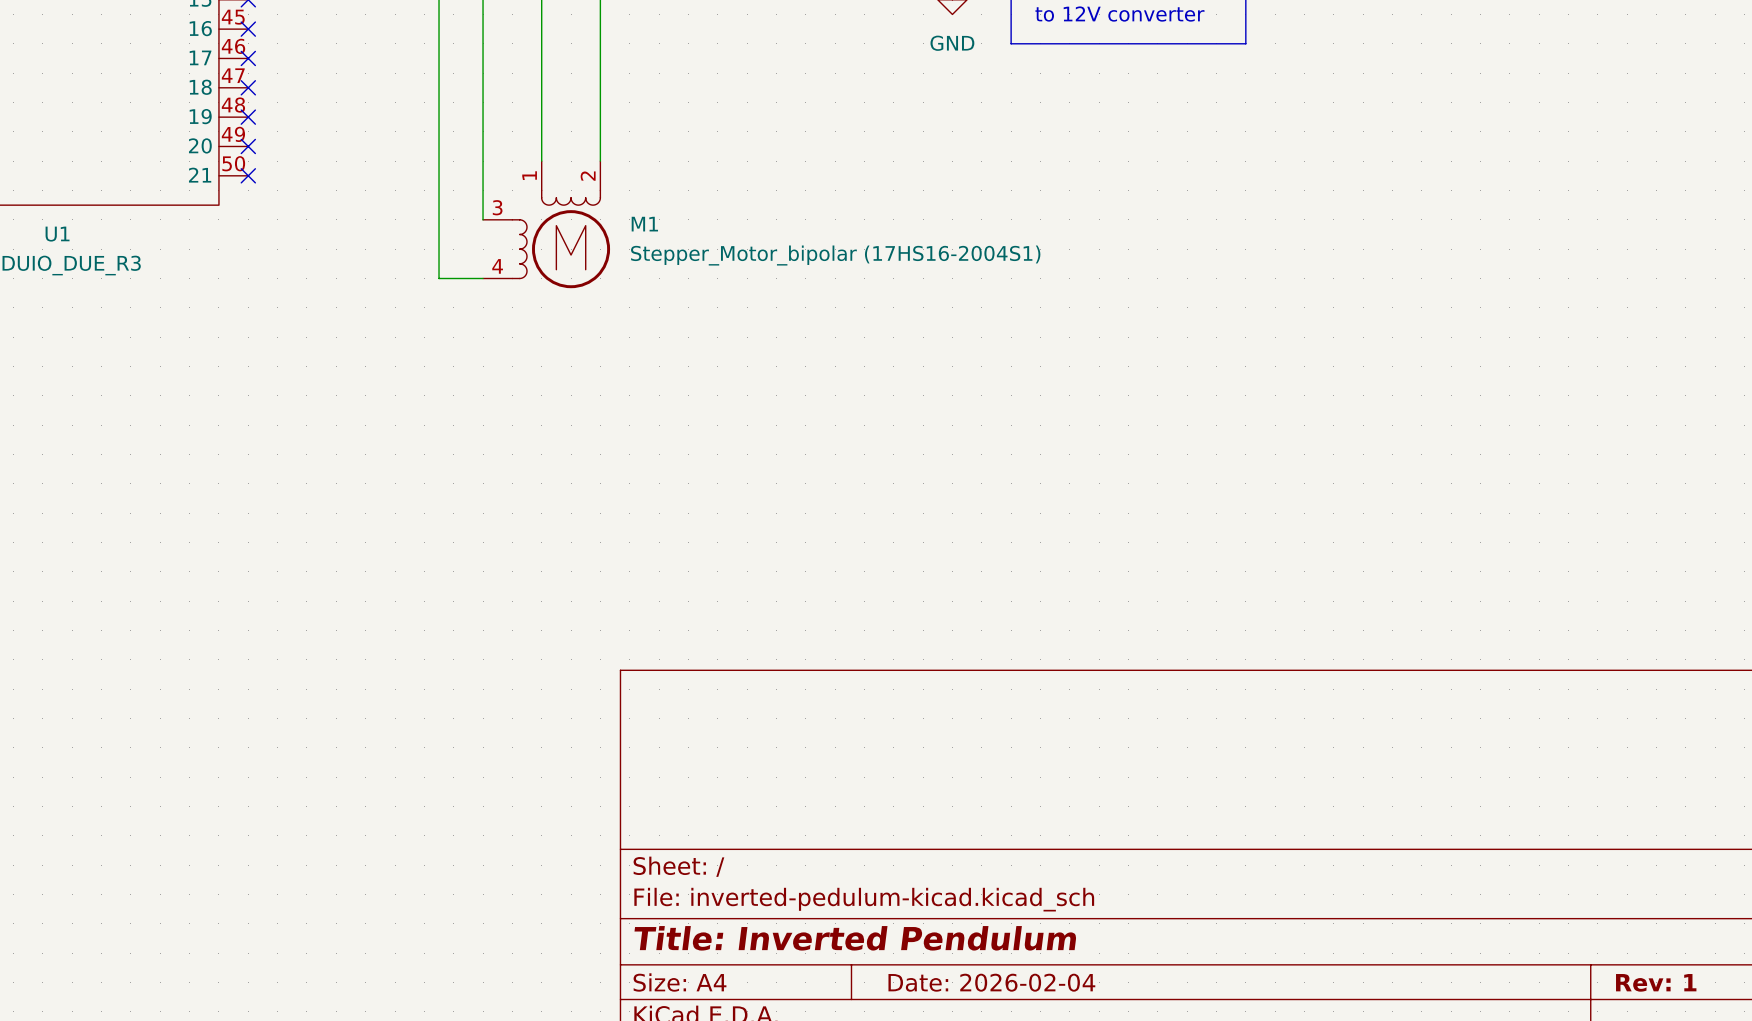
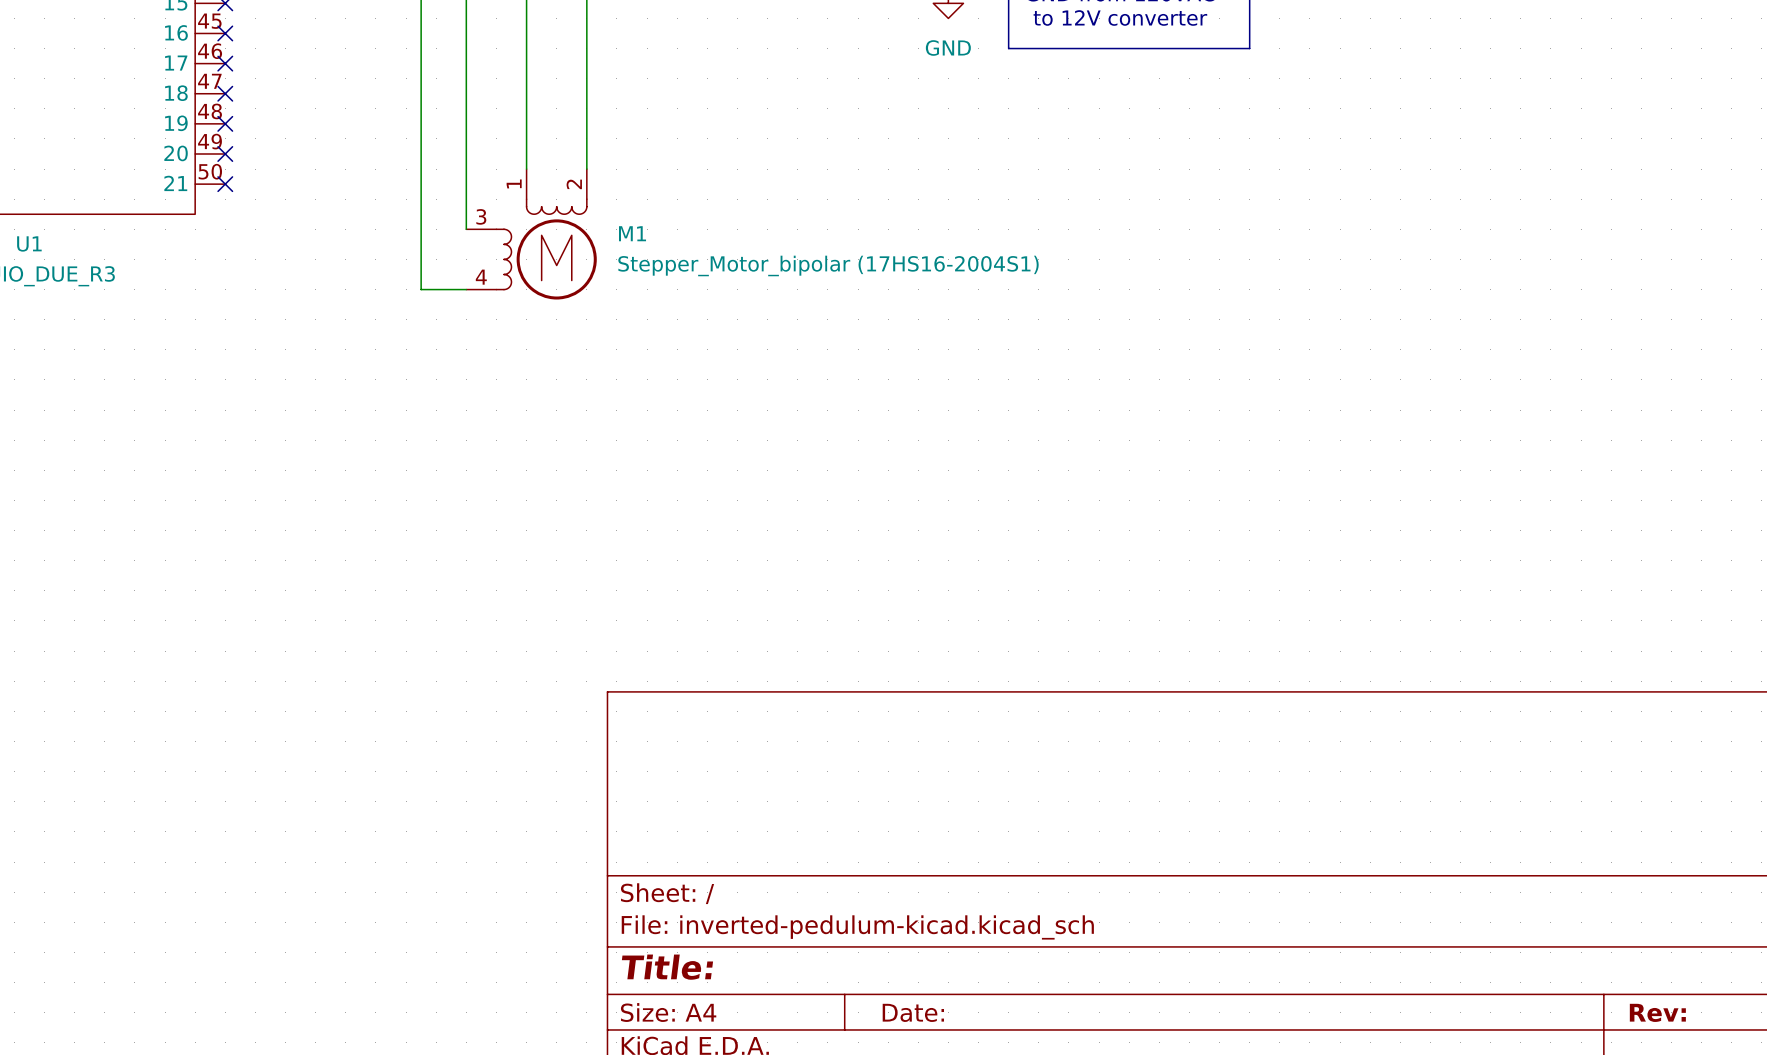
title block: Title: Inverted Pendulum (855, 938) -> Title: (667, 967)
title block: Date: 2026-02-04 (991, 982) -> Date: (913, 1012)
title block: Rev: 1 (1656, 982) -> Rev: (1657, 1012)

